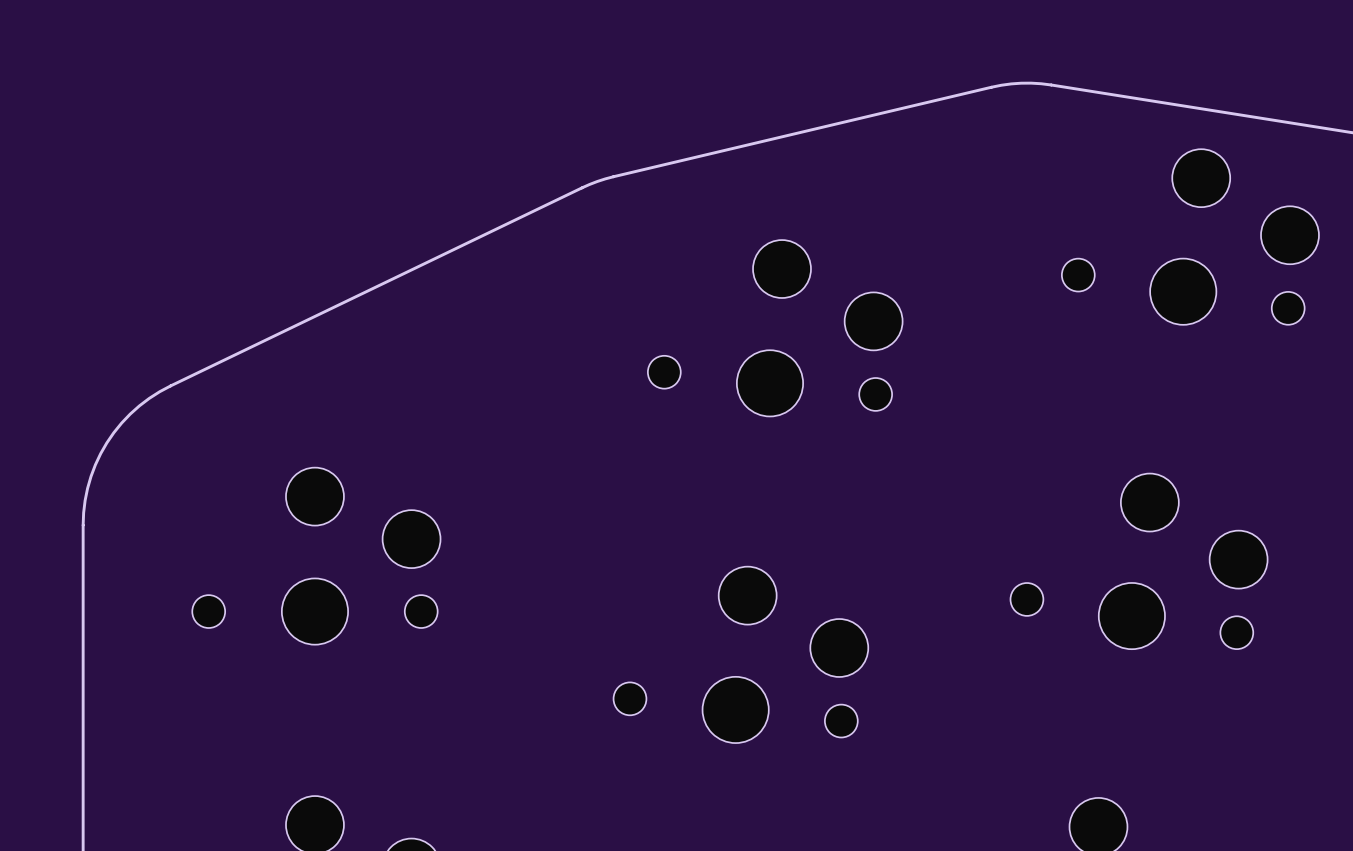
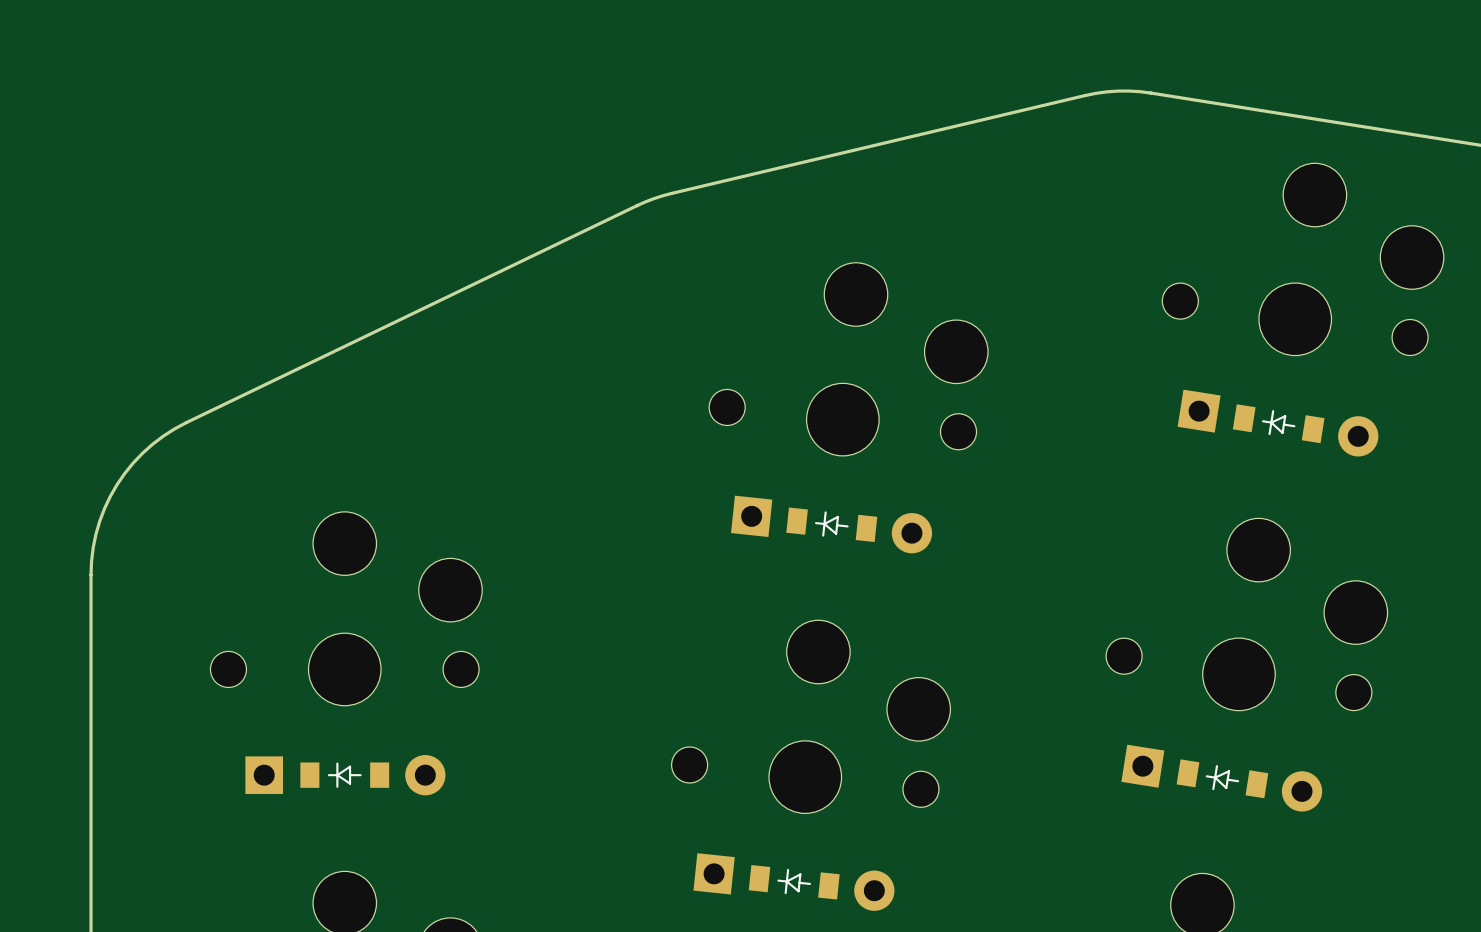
part: none -> (1278, 423)
part: none -> (831, 524)
part: none -> (345, 775)
part: none -> (1221, 778)
part: none -> (793, 882)

